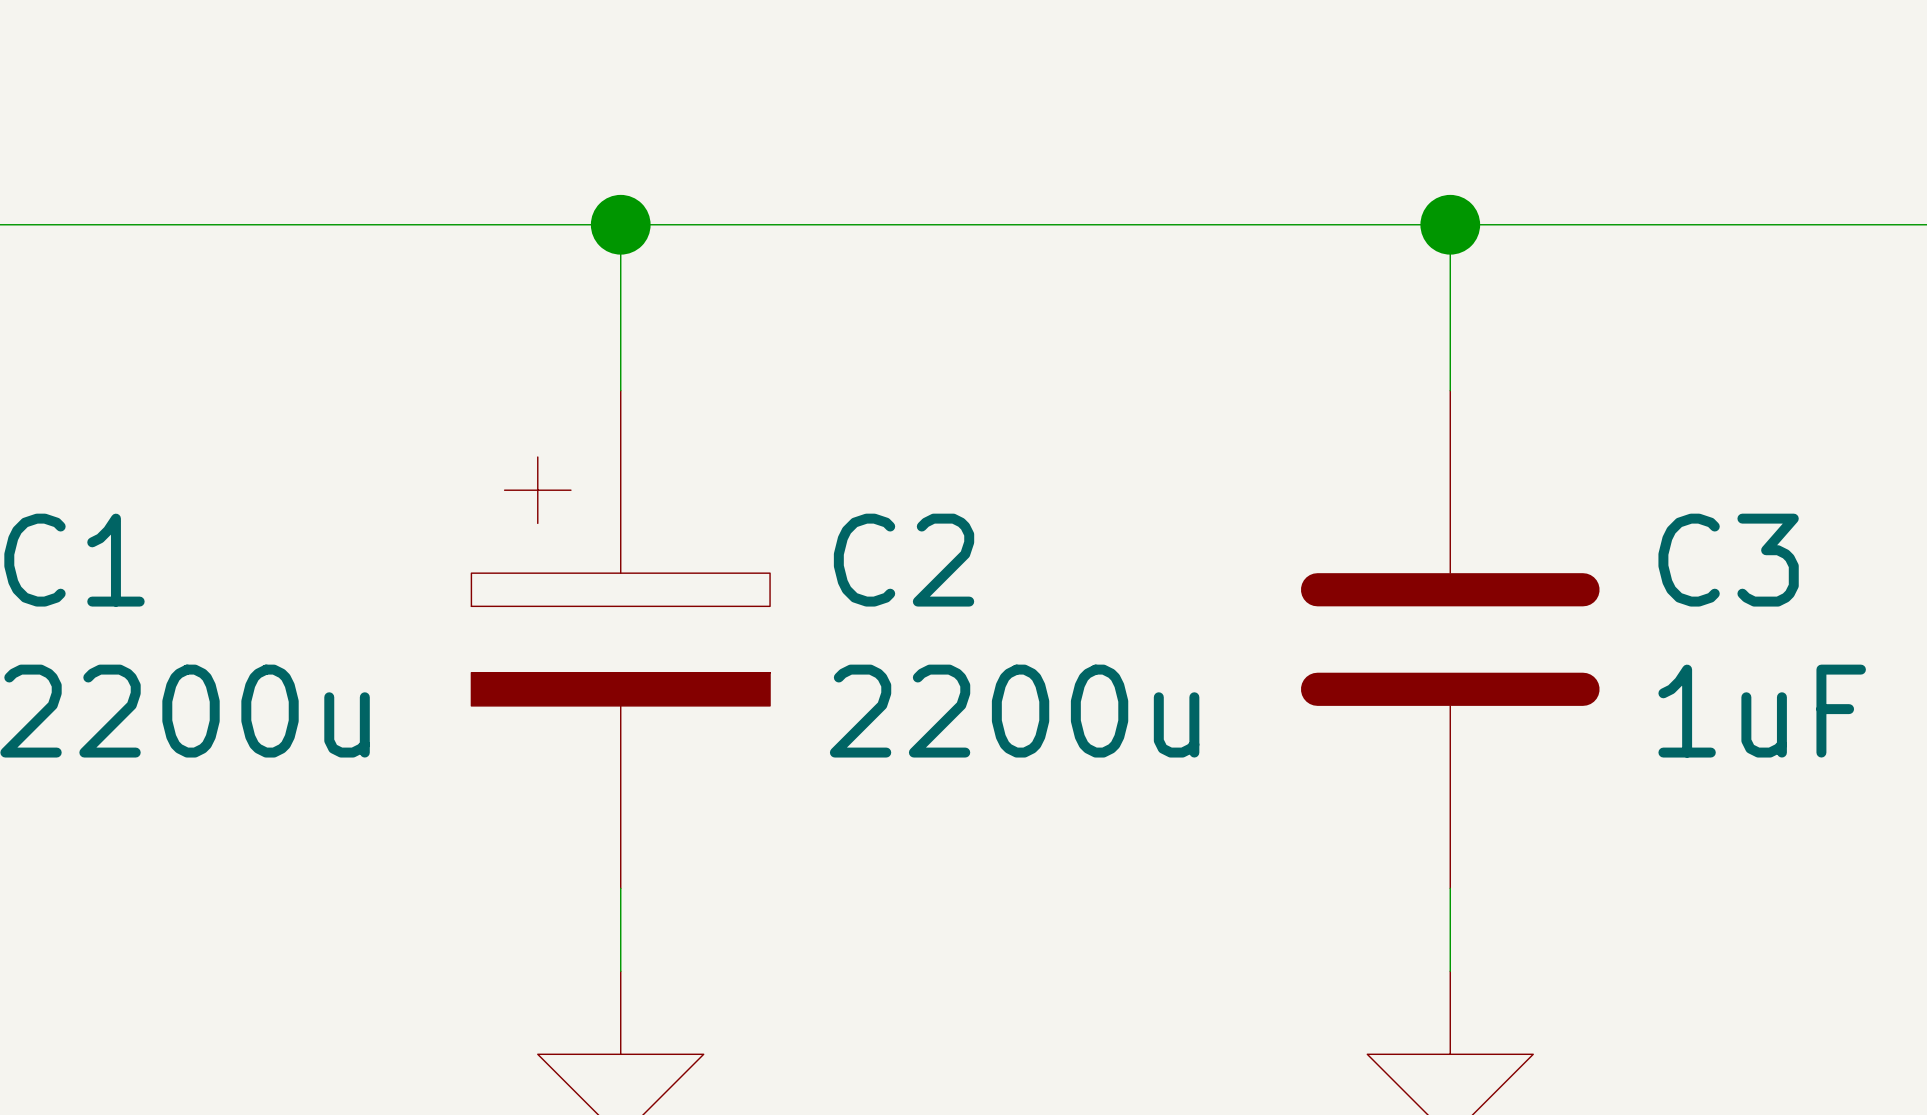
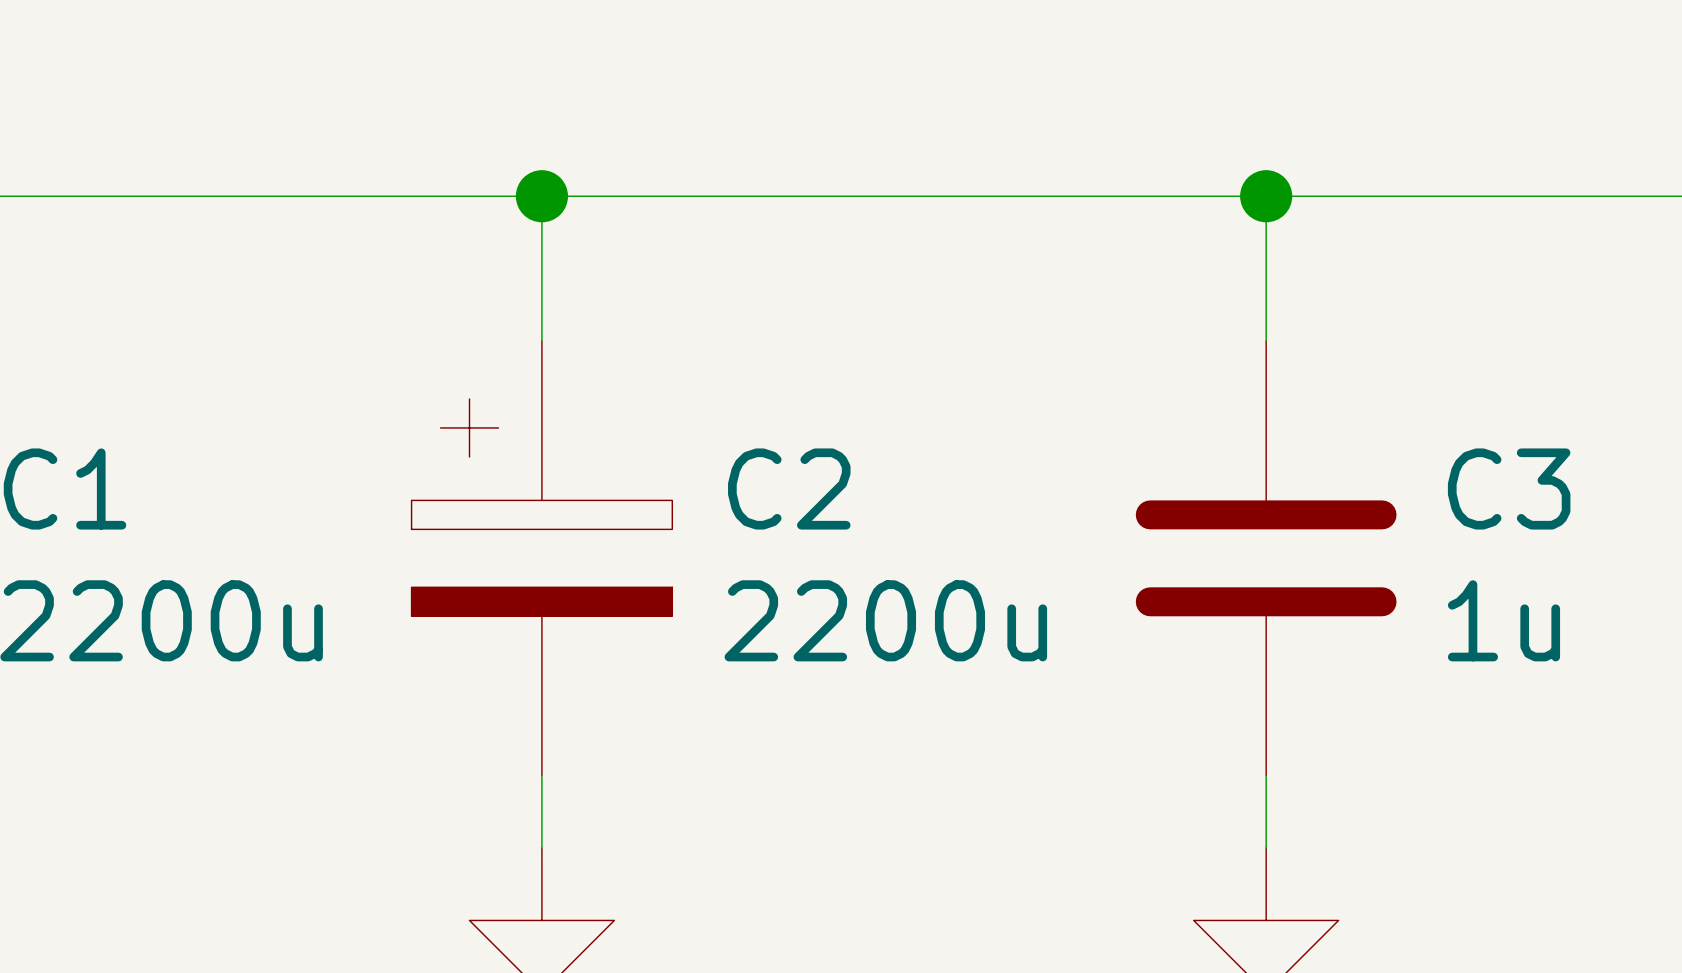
C3 value: 1uF (1762, 711) -> 1u (1503, 620)

